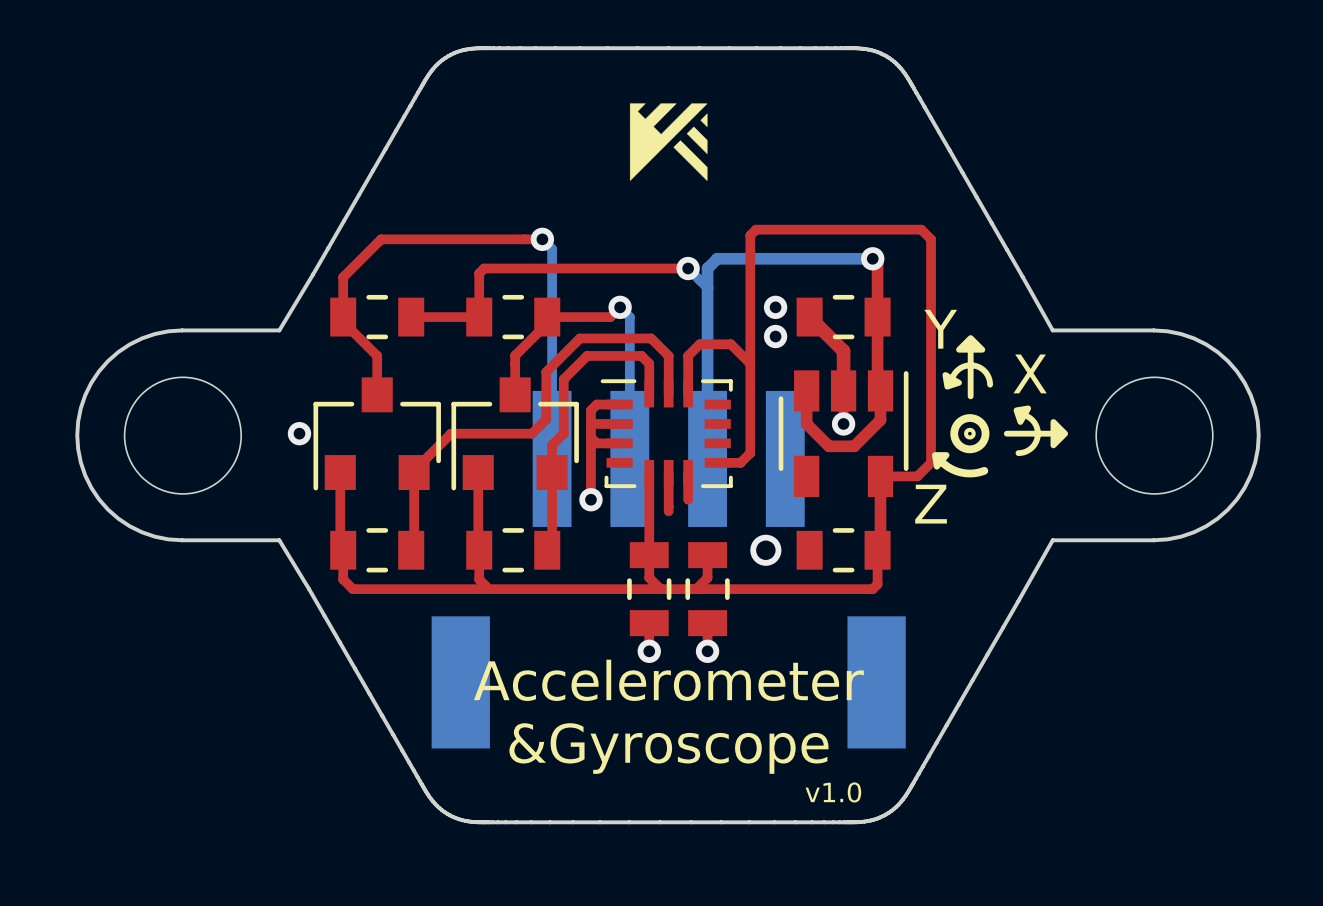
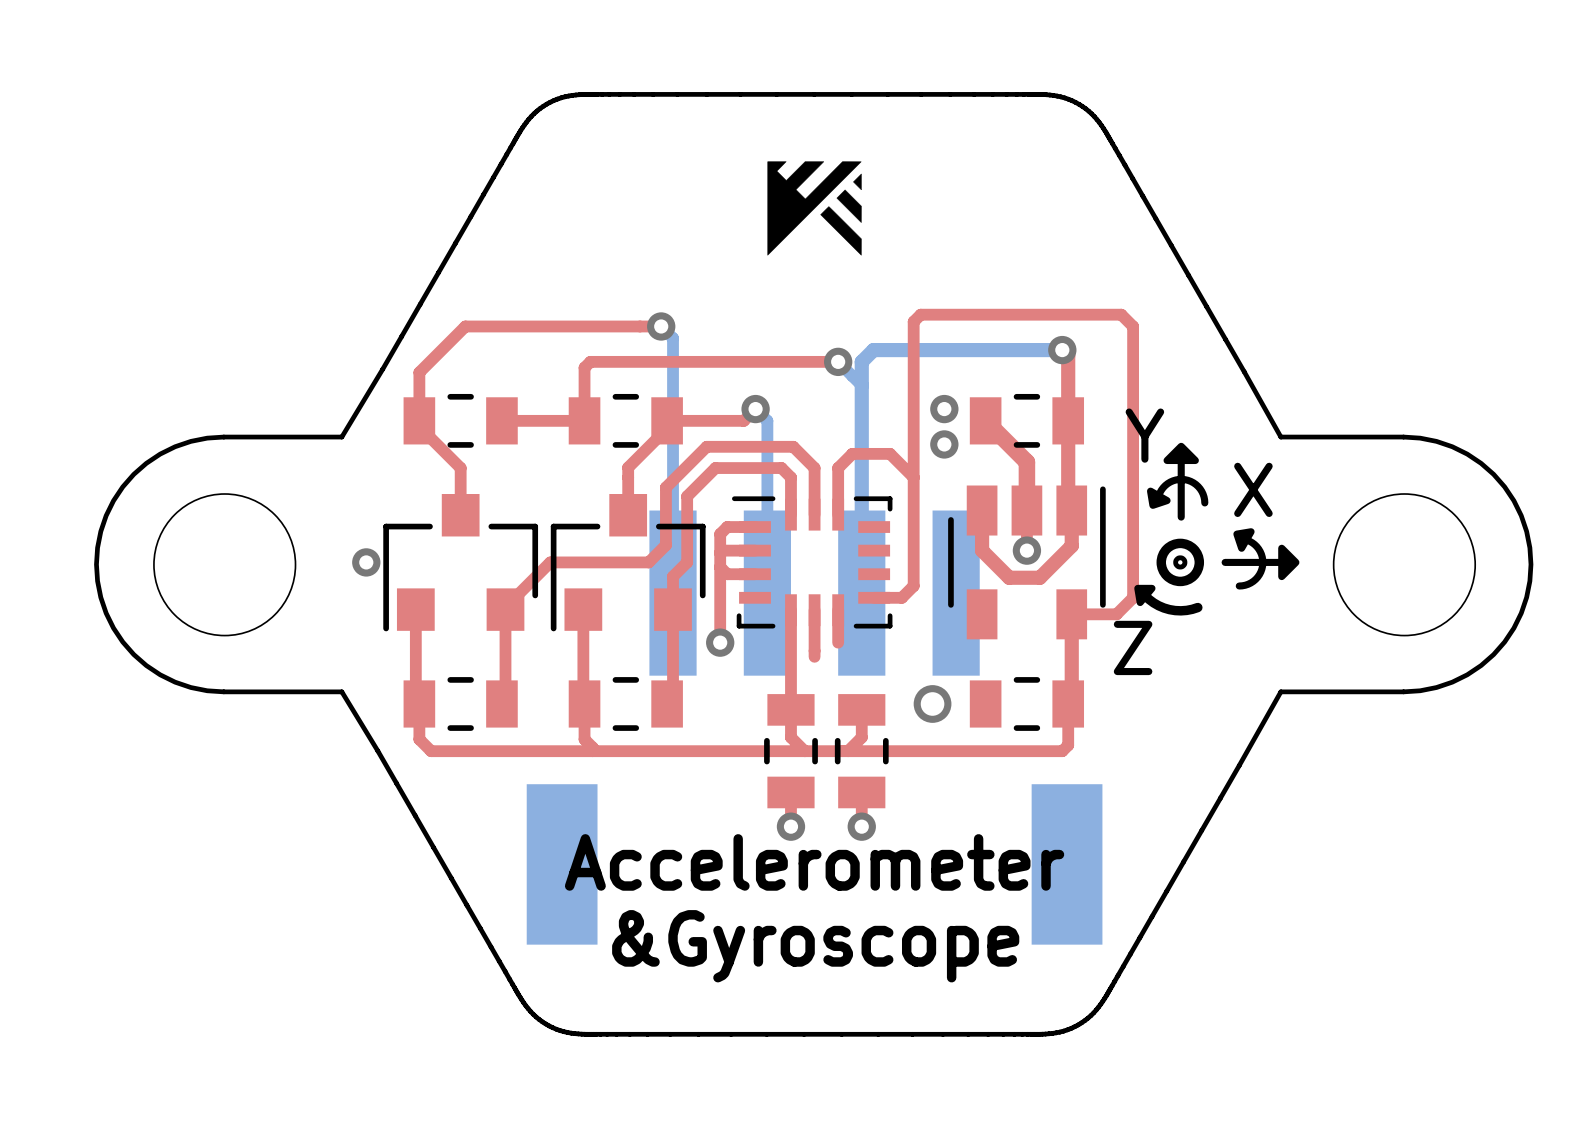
text: v1.0 (833, 792) -> none

